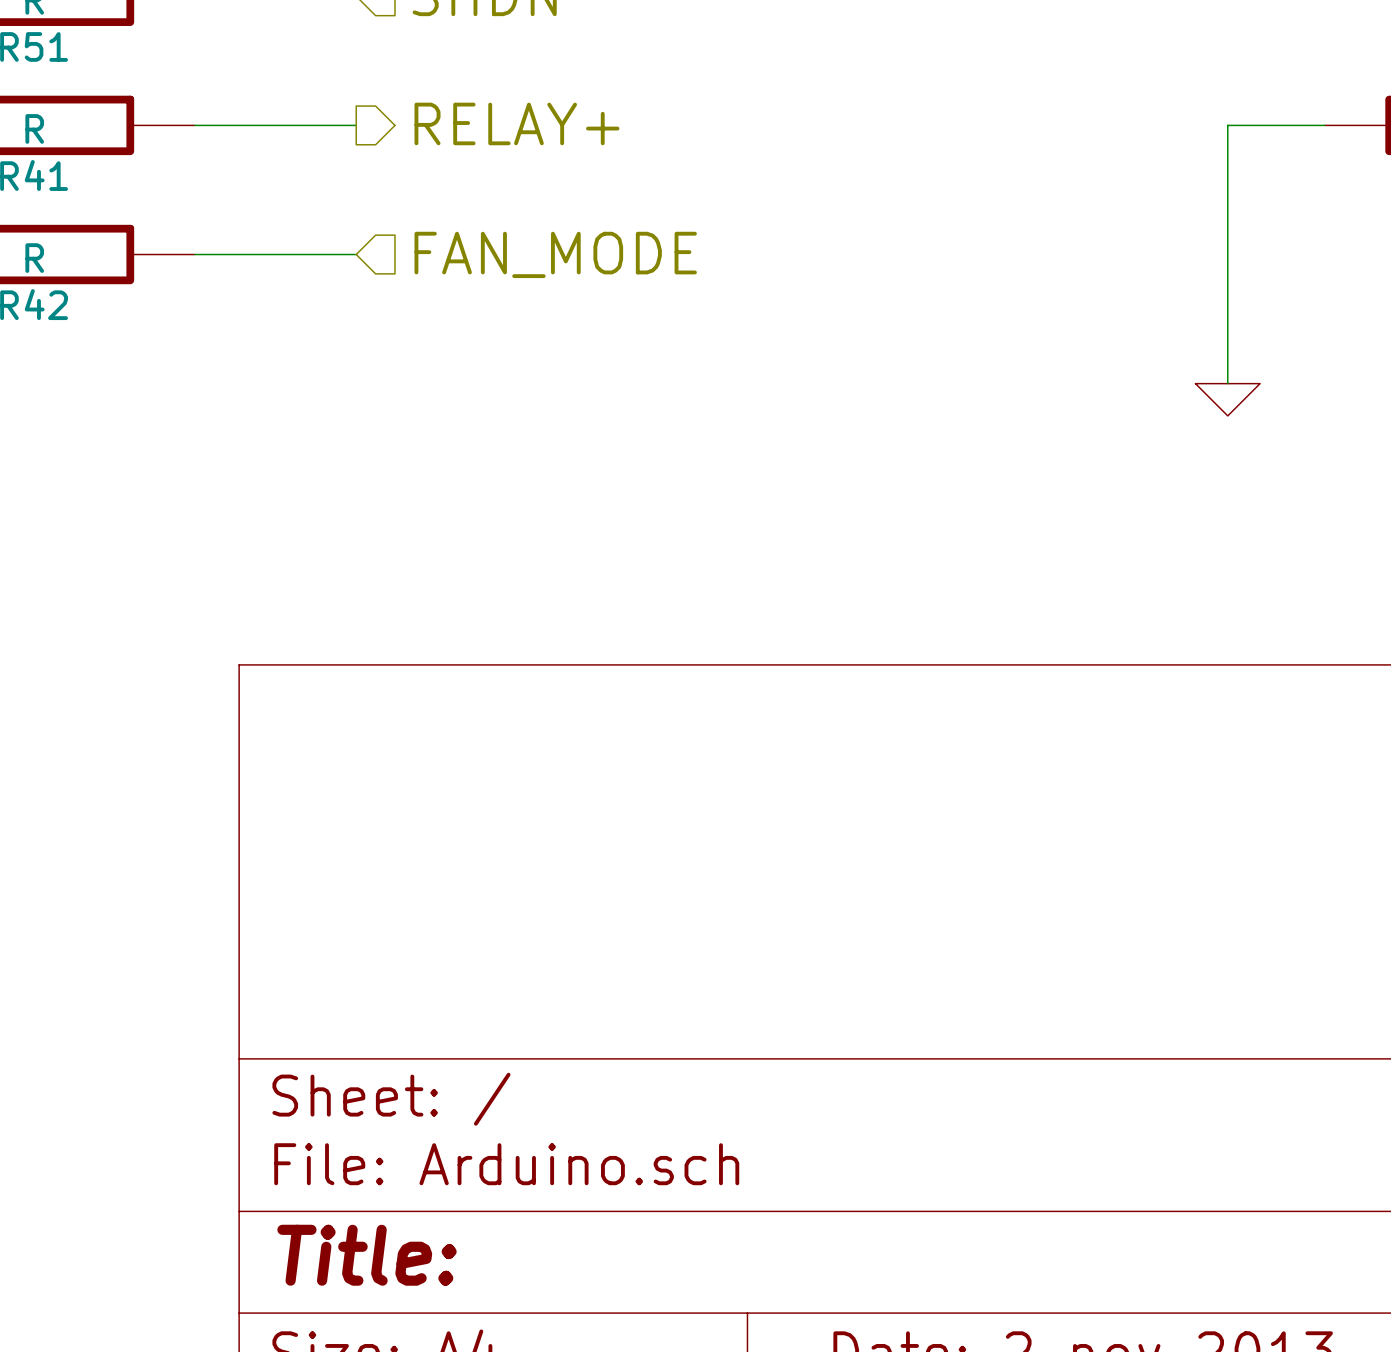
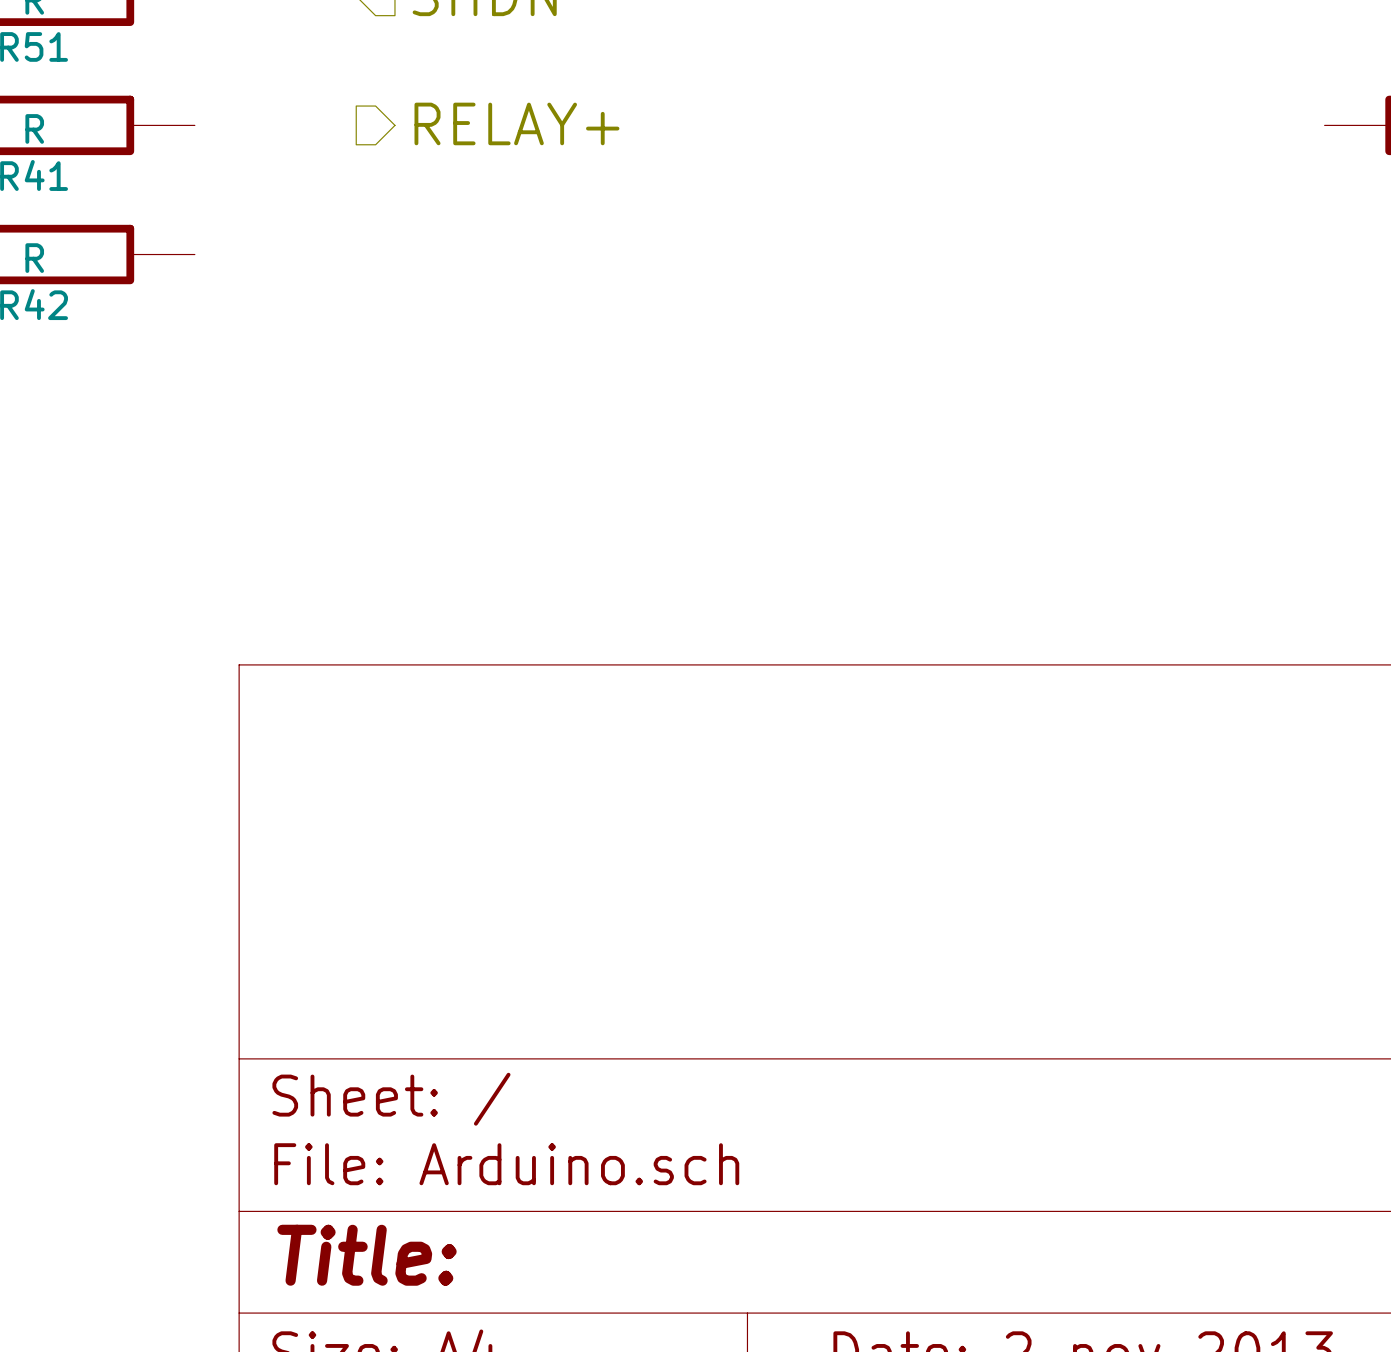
wire: (194, 125) (356, 125) -> none
wire: (1324, 125) (1227, 125) (1227, 383) -> none
wire: (194, 254) (356, 254) -> none
hierarchical label: FAN_MODE (555, 254) -> none
power symbol: (1227, 399) -> none

